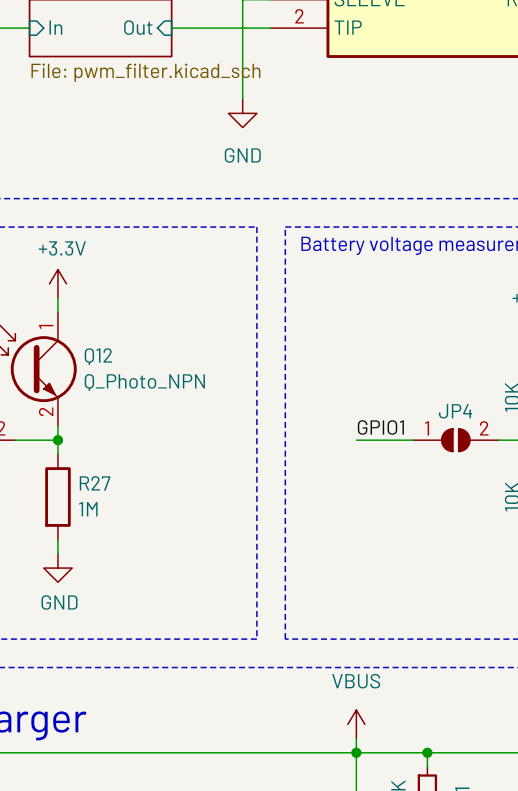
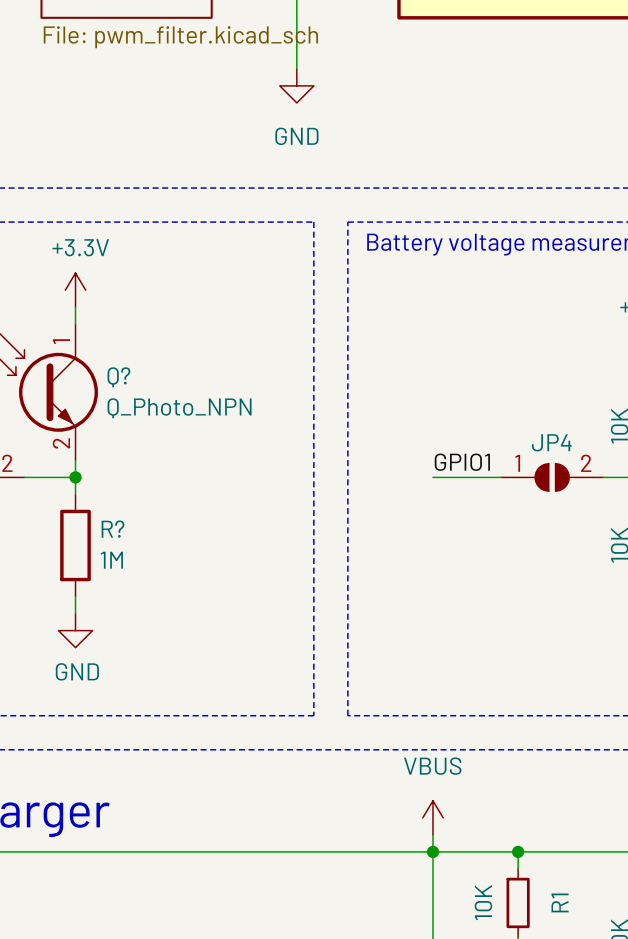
Q12 name: Q12 (98, 356) -> Q? (118, 377)
R27 name: R27 (95, 483) -> R? (113, 529)

